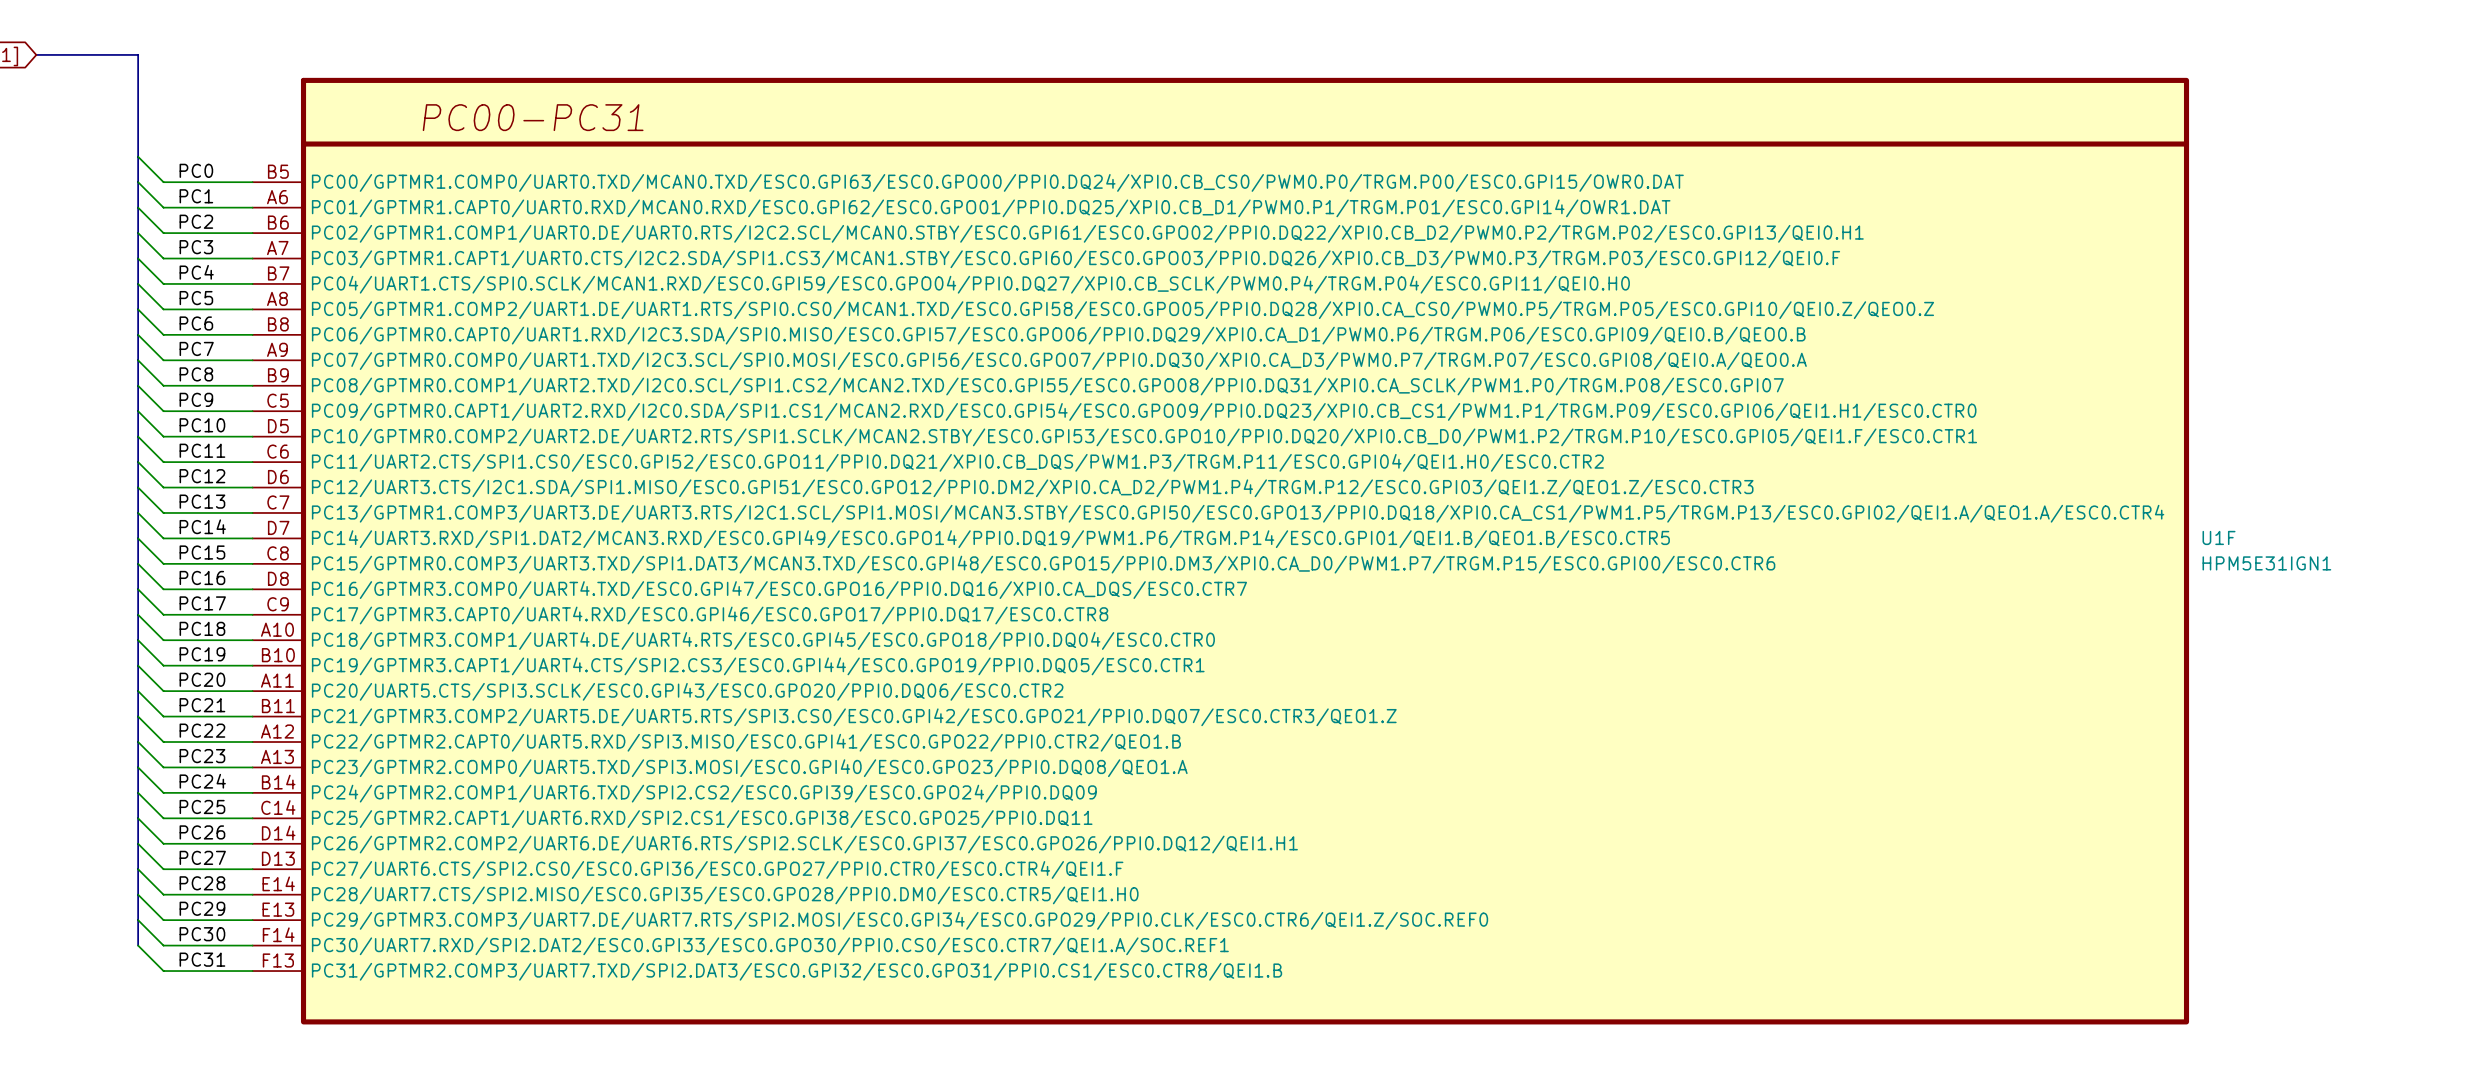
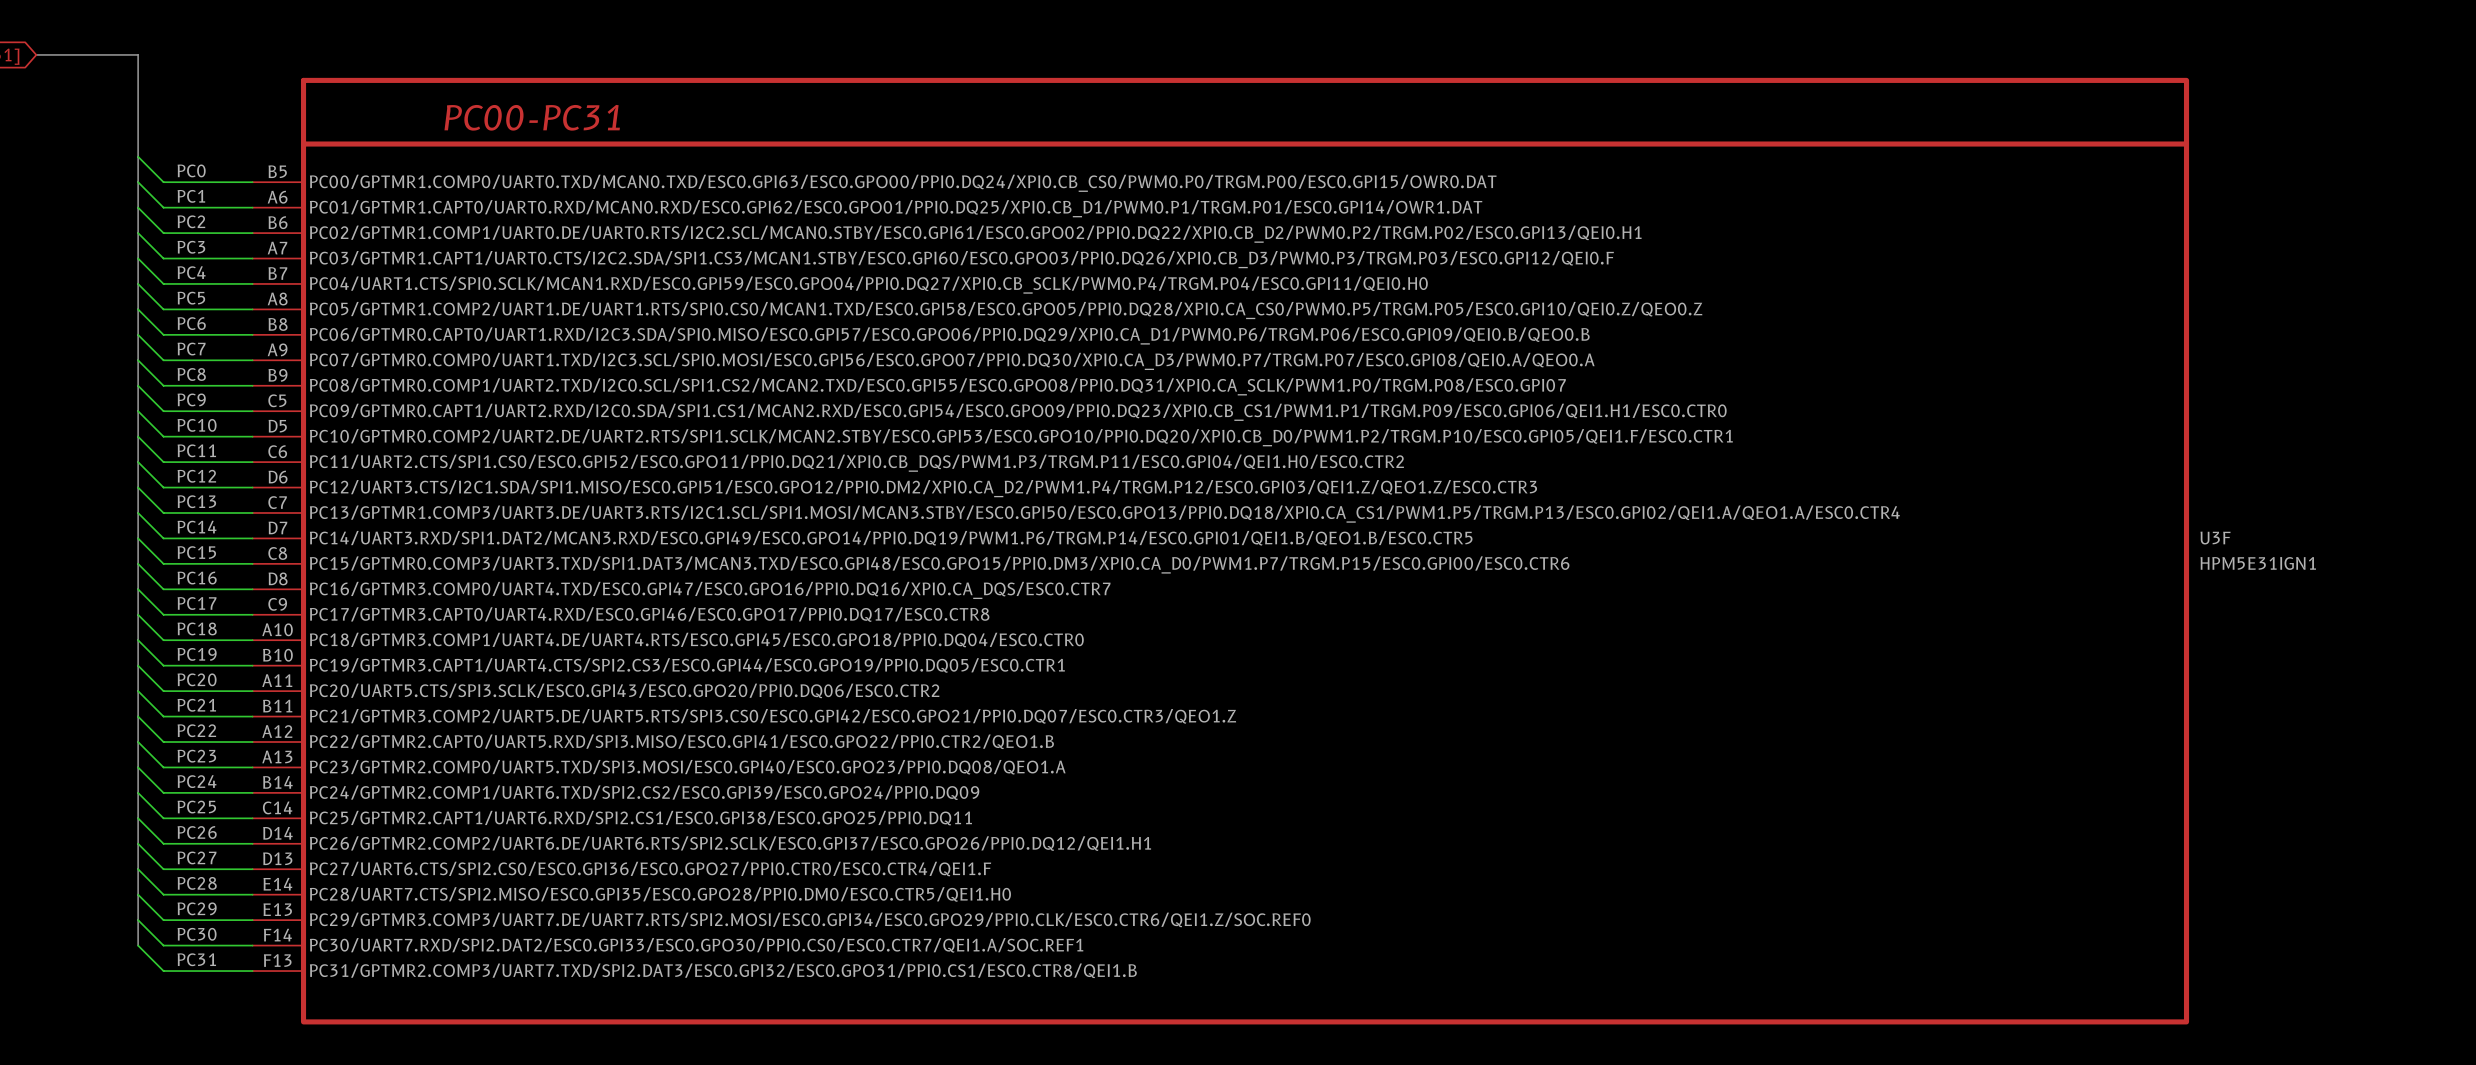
U1F name: U1F (2219, 537) -> U3F (2215, 538)

